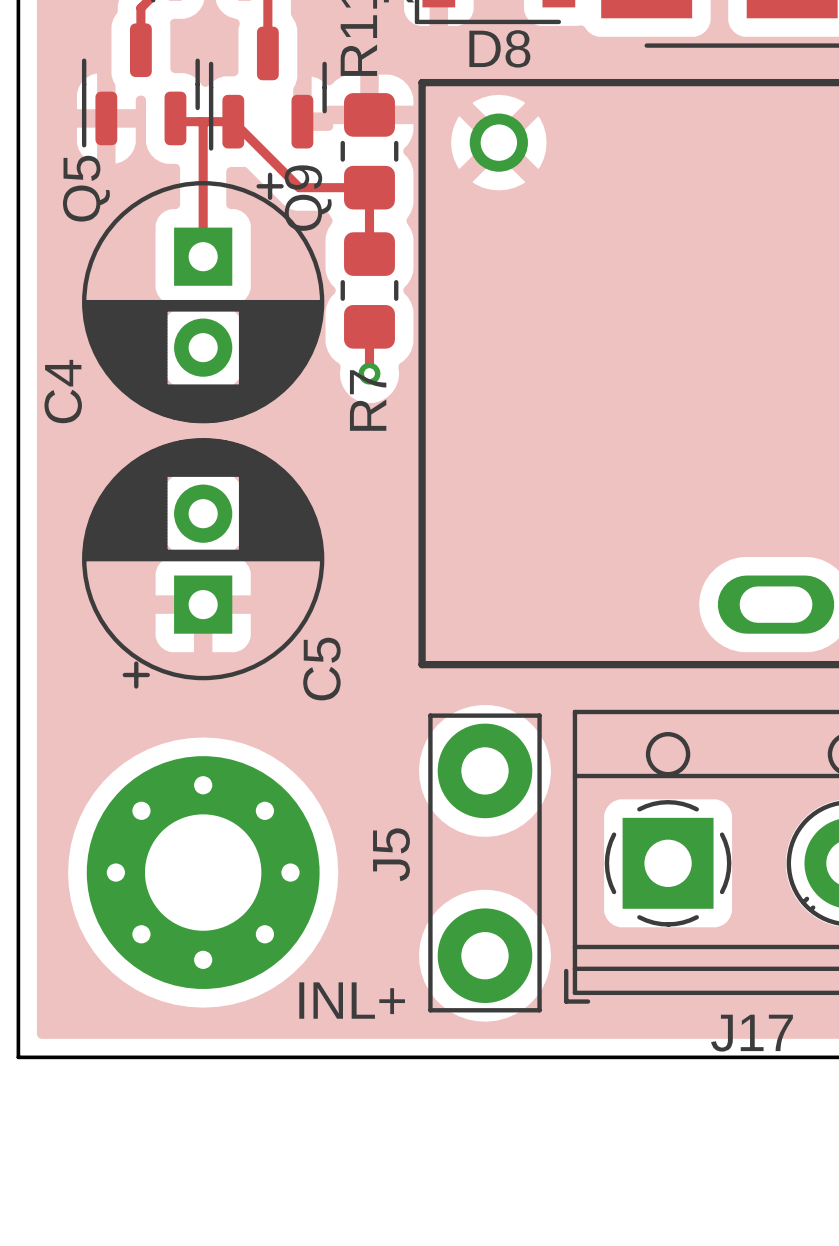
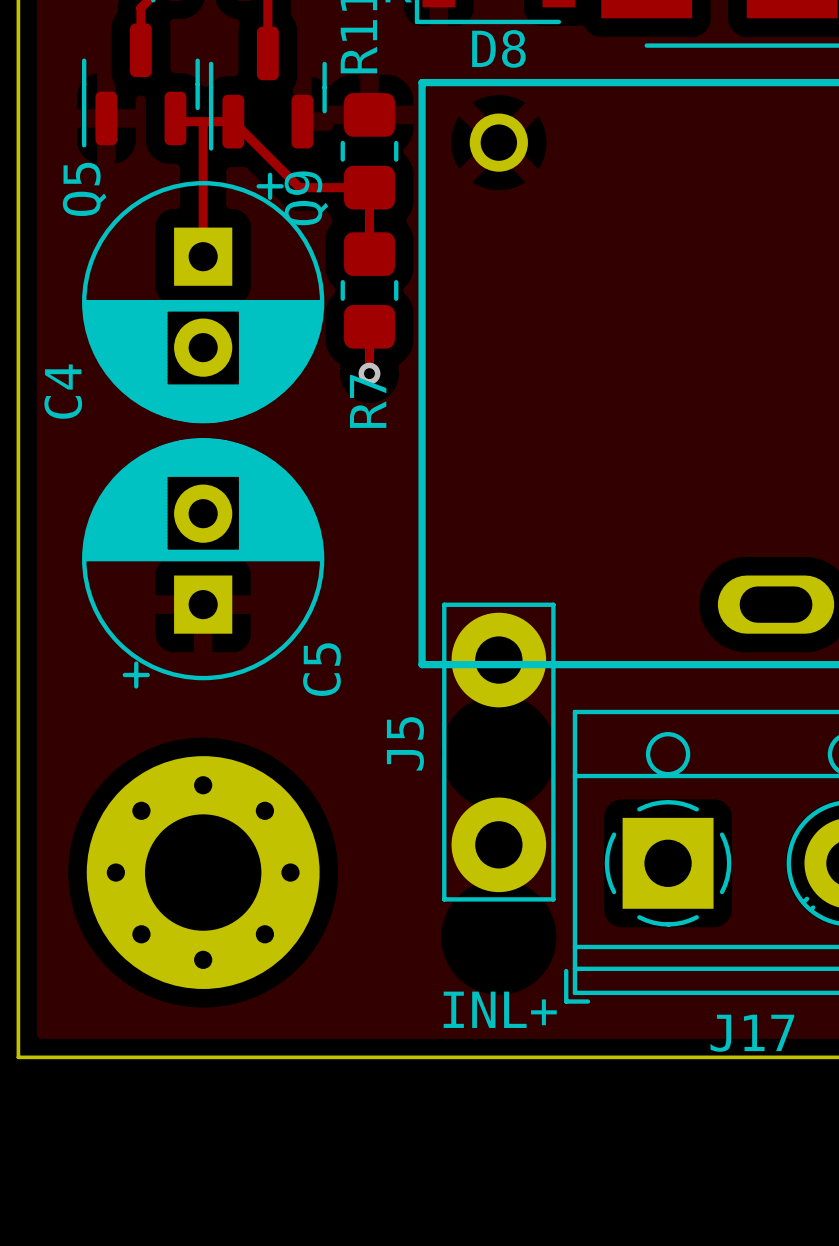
J5 position: (484, 862) -> (498, 752)
text position: INL+ (352, 1000) -> INL+ (500, 1009)

